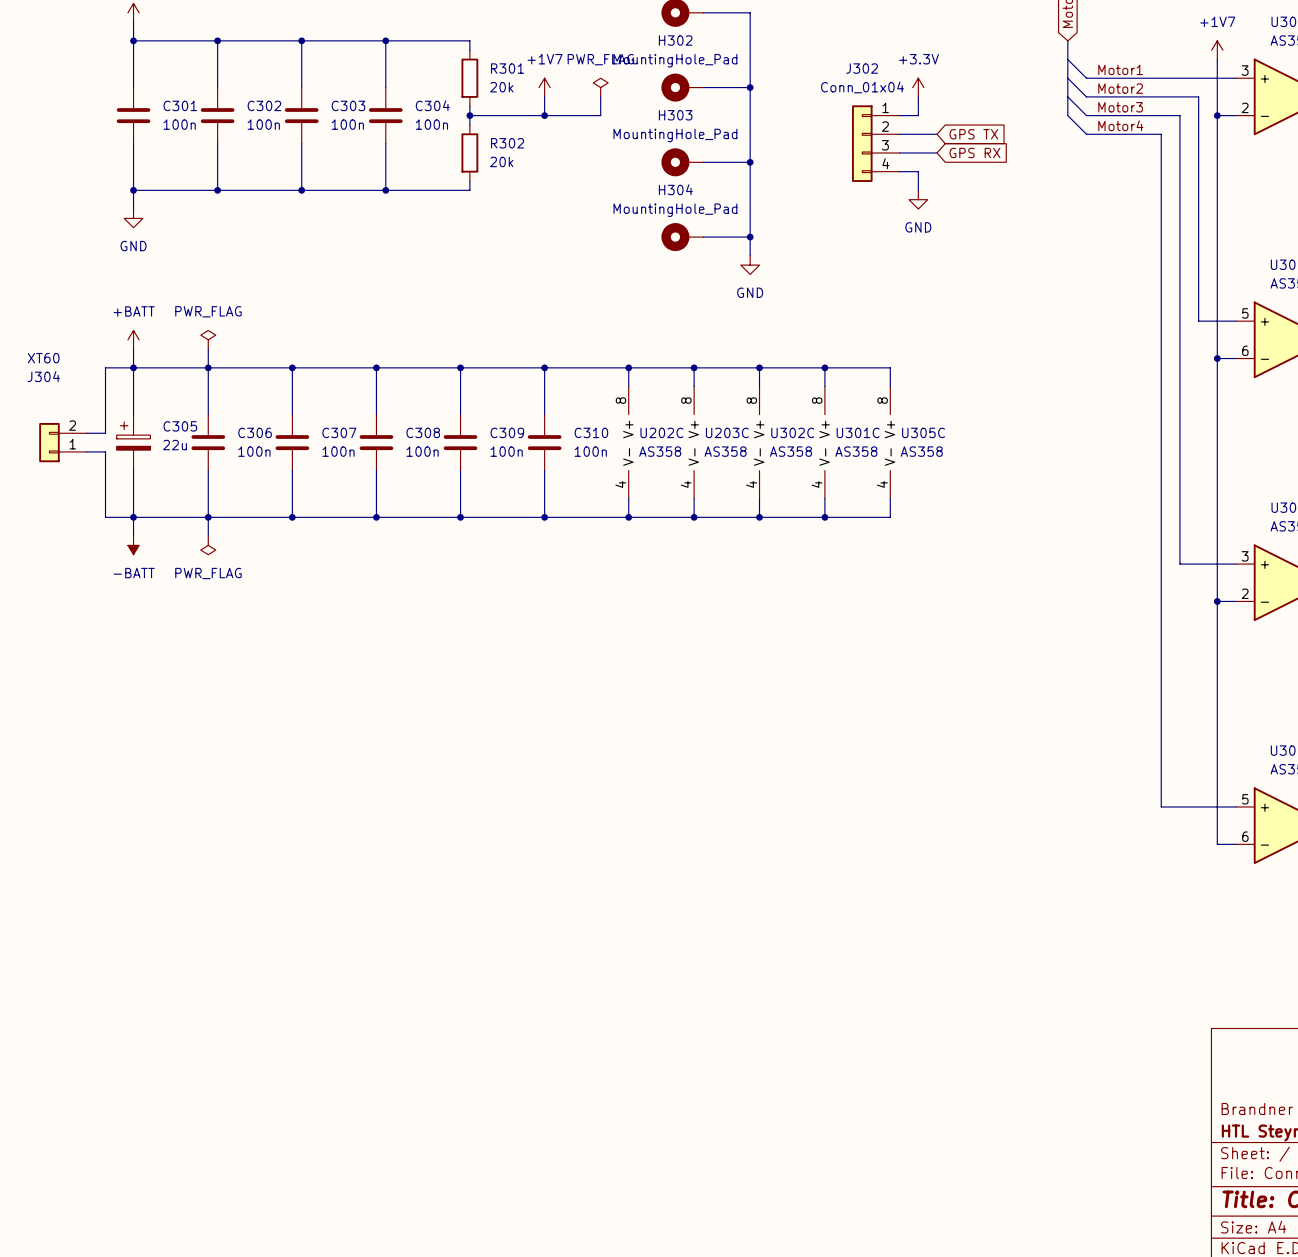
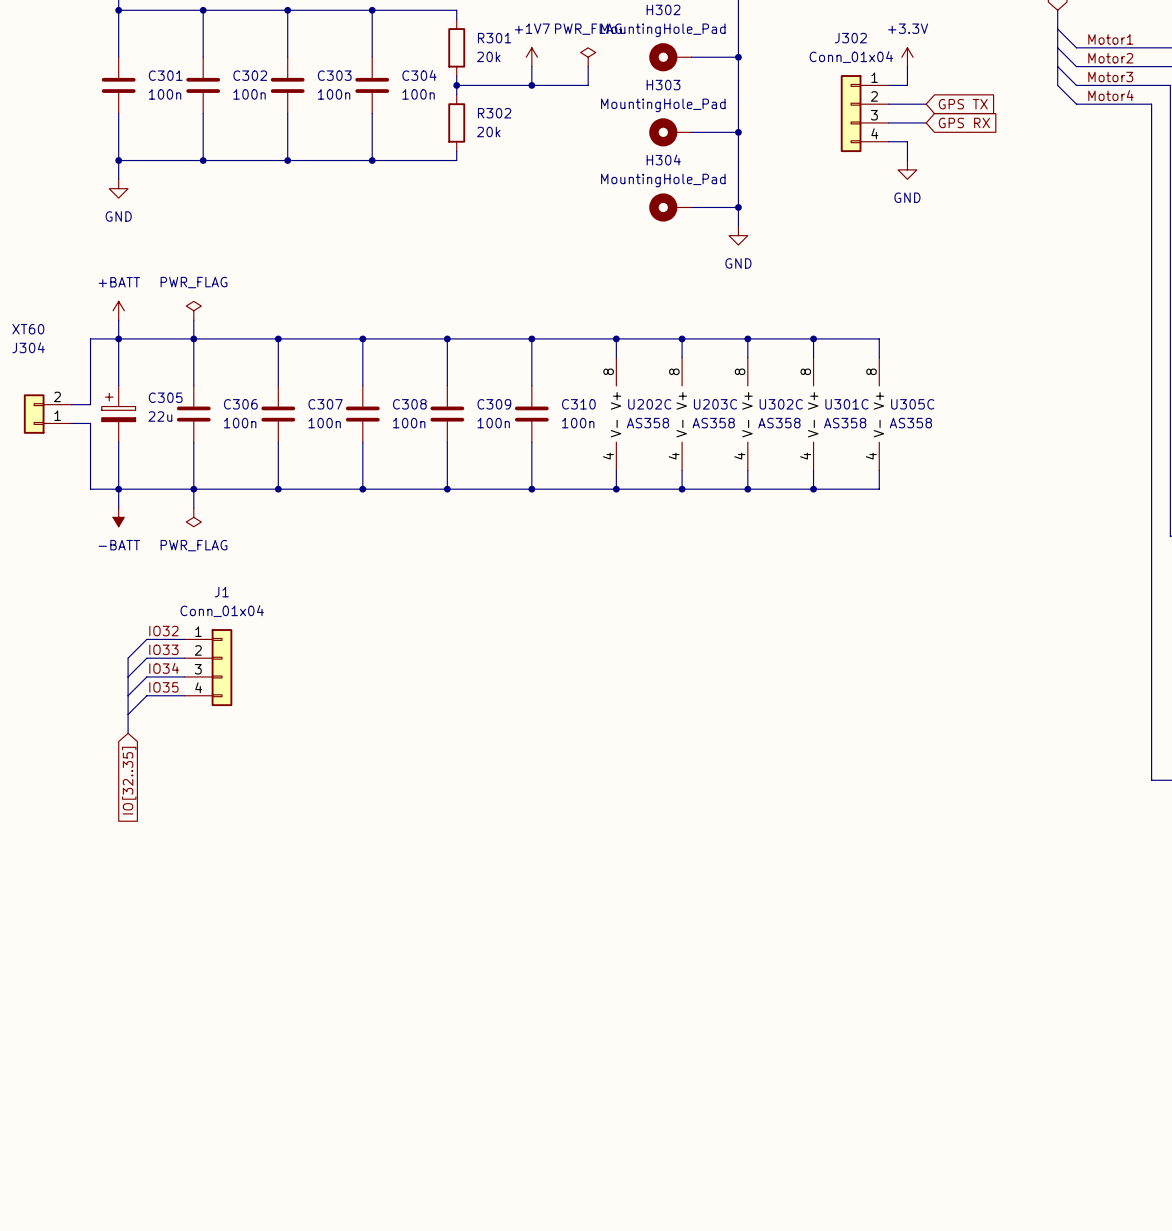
label: none -> IO32 (163, 631)
wire: none -> (184, 639) (146, 639) (128, 658)
label: none -> IO33 (163, 649)
bus: none -> (128, 658) (128, 733)
wire: none -> (184, 658) (146, 658) (128, 676)
J1: none -> Conn_01x04 (208, 667)
label: none -> IO34 (164, 668)
wire: none -> (184, 676) (146, 676) (128, 695)
label: none -> IO35 (163, 687)
wire: none -> (184, 695) (146, 695) (128, 714)
global label: none -> IO[32..35] (129, 780)

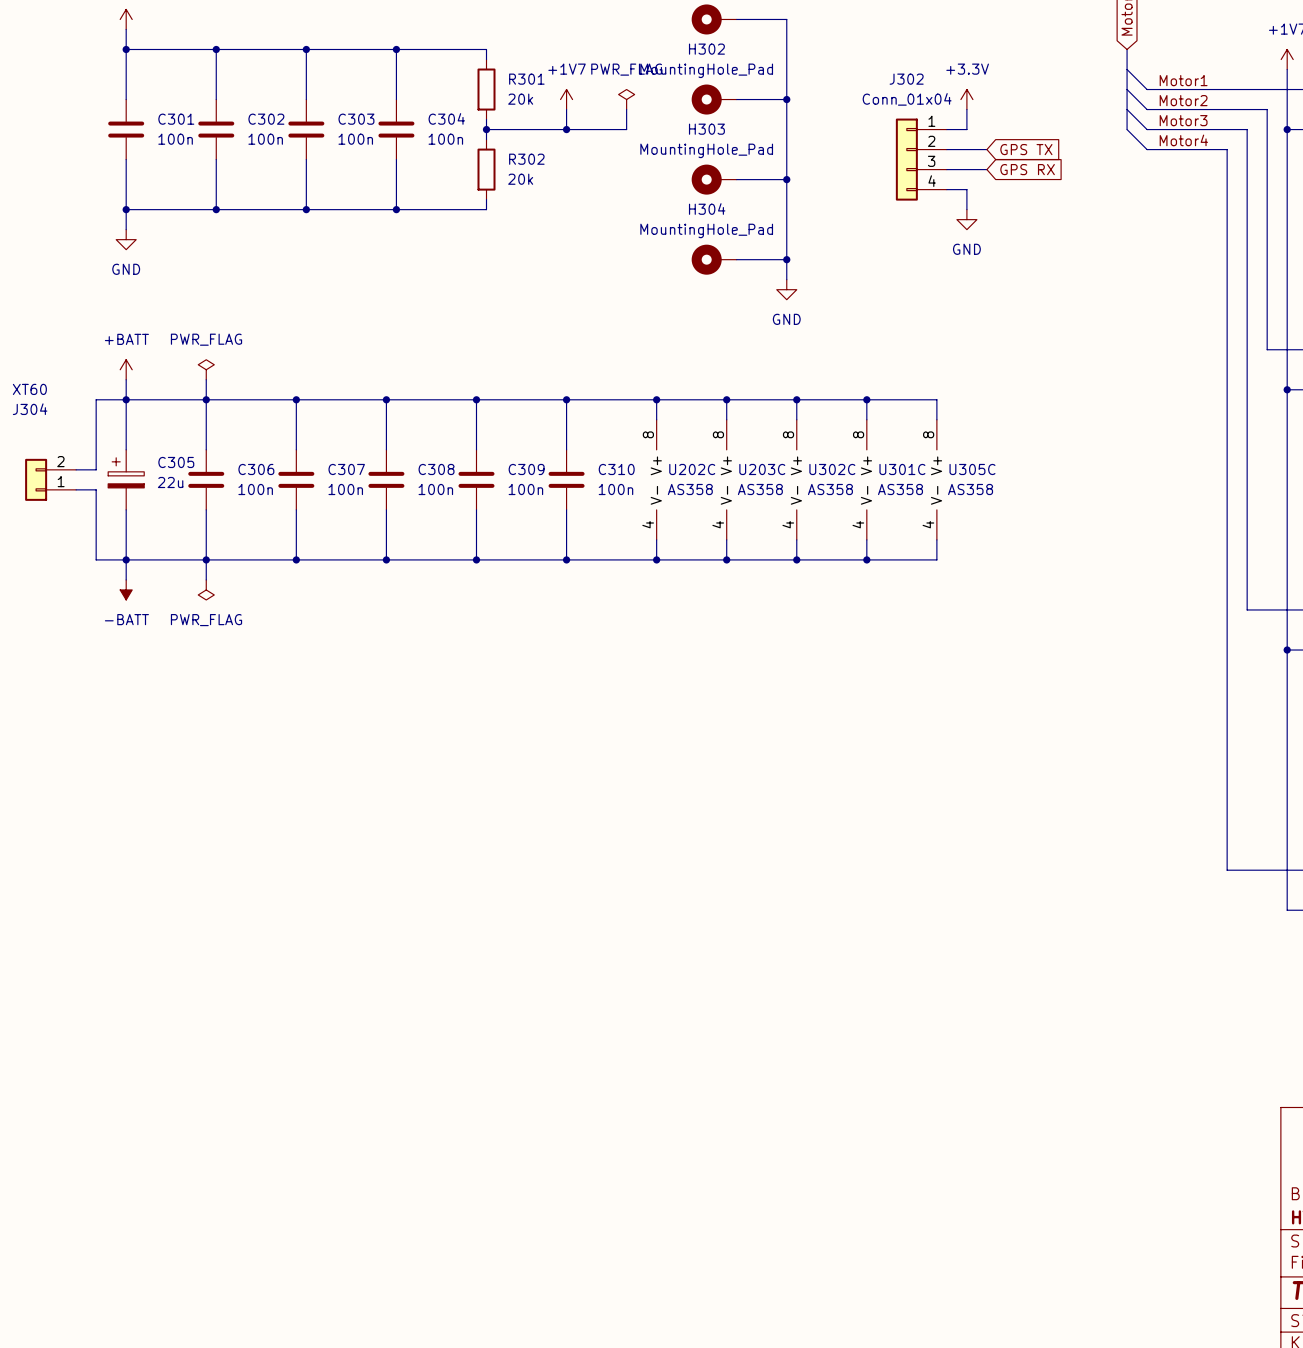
label: IO32 (163, 631) -> none
wire: (184, 639) (146, 639) (128, 658) -> none
label: IO33 (163, 649) -> none
bus: (128, 658) (128, 733) -> none
wire: (184, 658) (146, 658) (128, 676) -> none
J1: Conn_01x04 (208, 667) -> none
label: IO34 (164, 668) -> none
wire: (184, 676) (146, 676) (128, 695) -> none
label: IO35 (163, 687) -> none
wire: (184, 695) (146, 695) (128, 714) -> none
global label: IO[32..35] (129, 780) -> none

